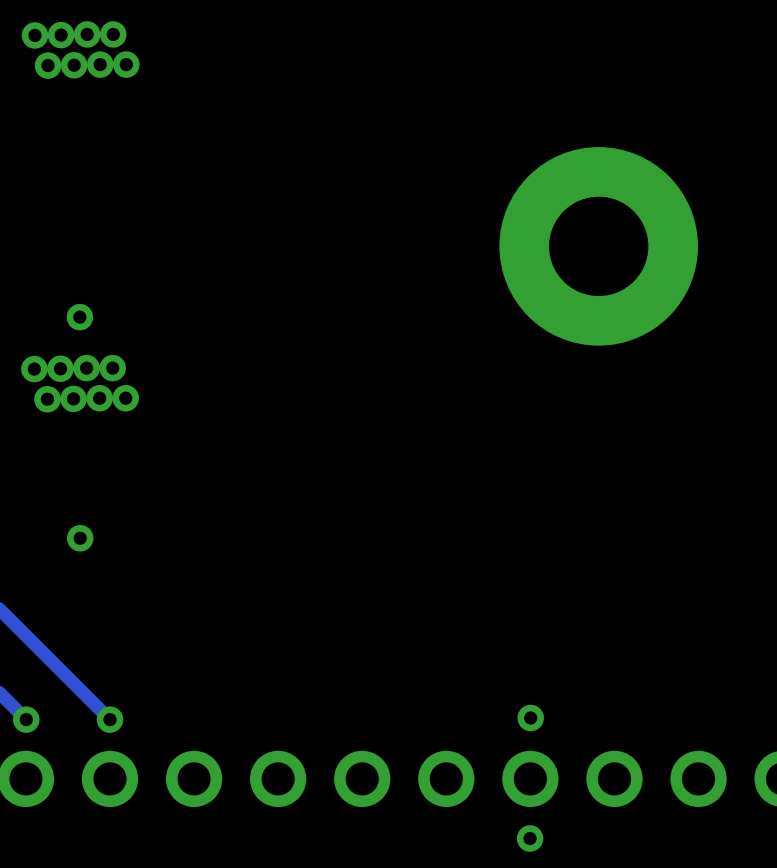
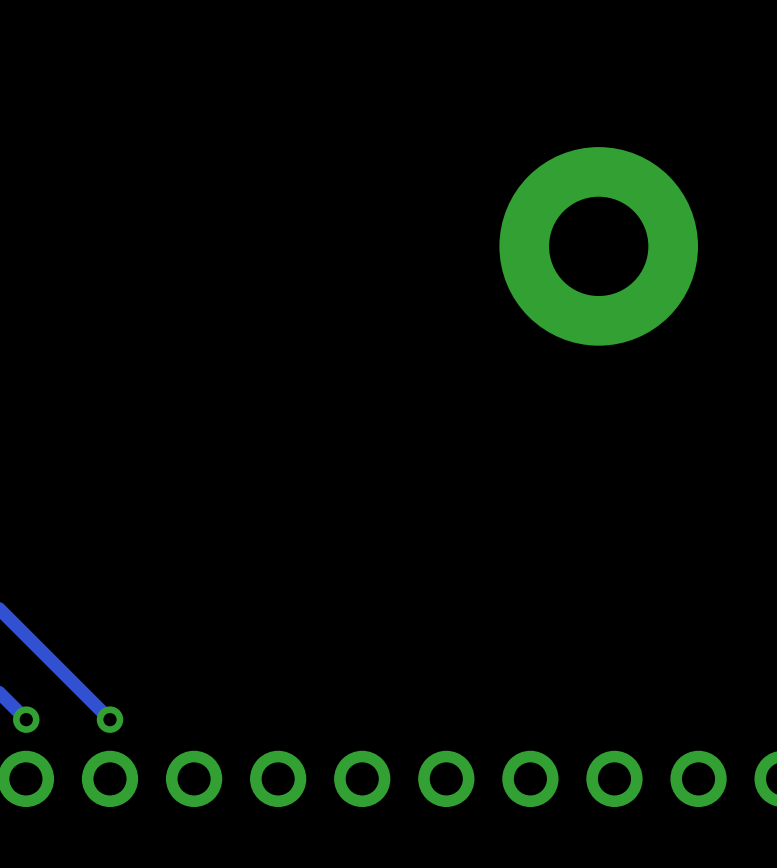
via: (87, 34) -> none
via: (113, 34) -> none
via: (34, 35) -> none
via: (61, 35) -> none
via: (100, 64) -> none
via: (126, 64) -> none
via: (48, 65) -> none
via: (74, 65) -> none
via: (79, 317) -> none
via: (60, 368) -> none
via: (86, 368) -> none
via: (112, 368) -> none
via: (34, 369) -> none
via: (73, 398) -> none
via: (99, 398) -> none
via: (125, 398) -> none
via: (47, 399) -> none
via: (80, 538) -> none
via: (530, 717) -> none
via: (530, 838) -> none

